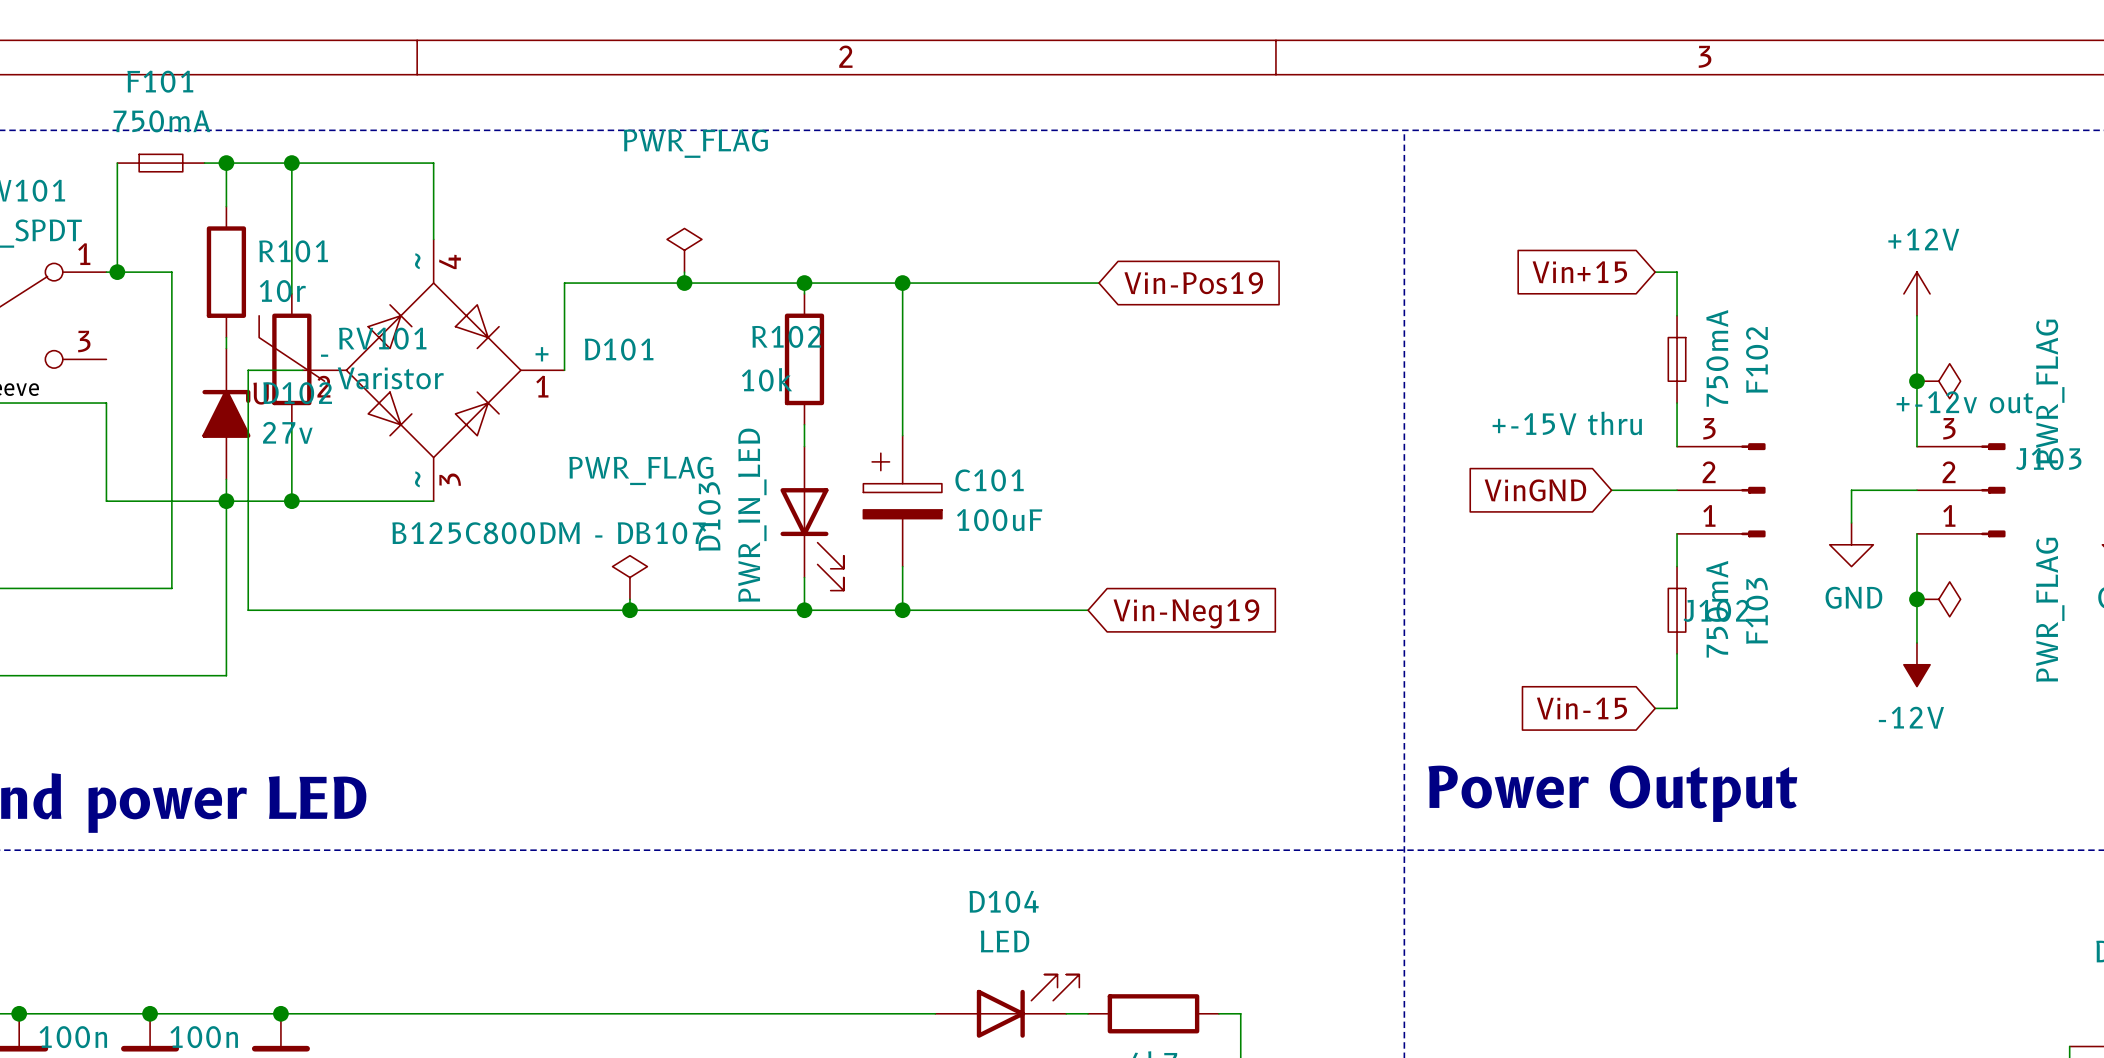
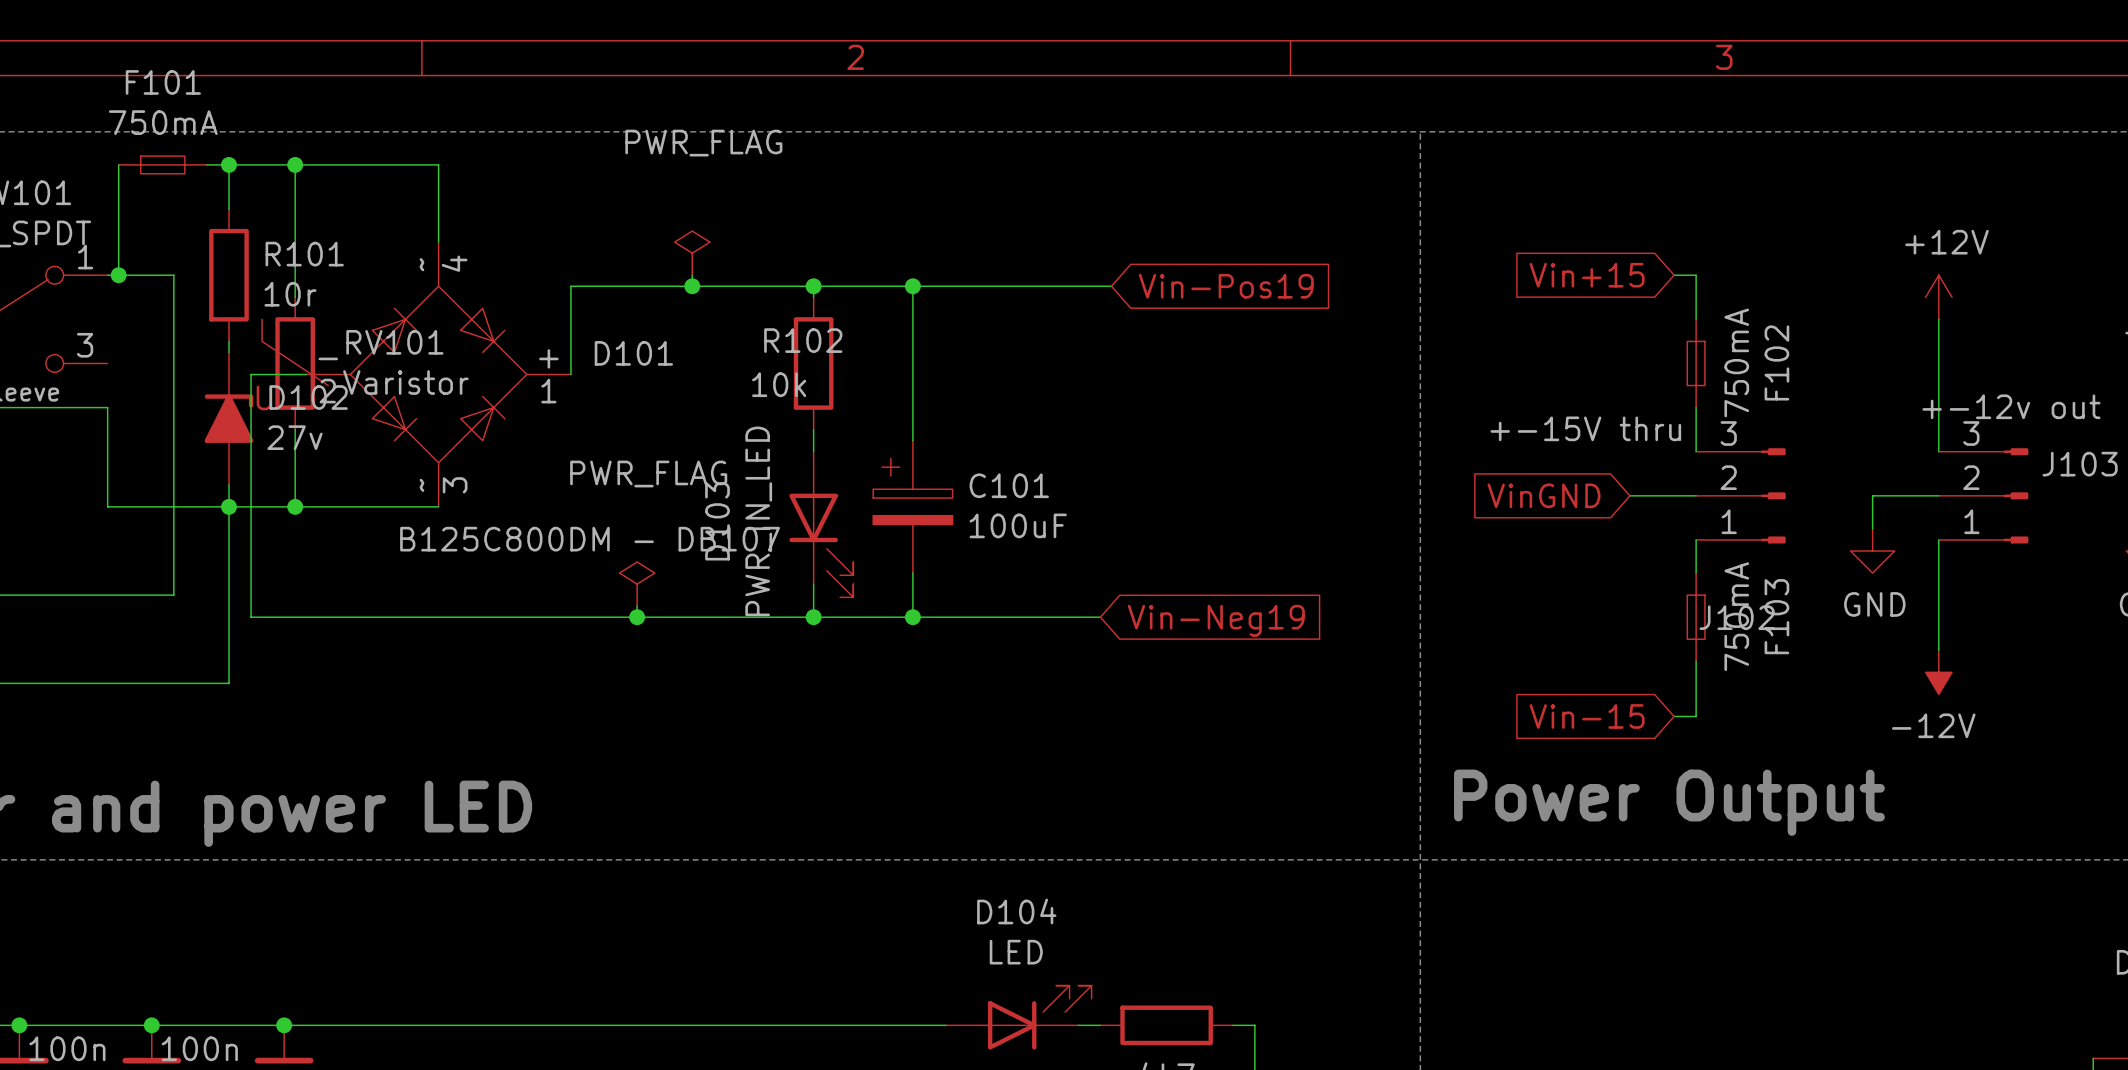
junction: (1916, 381) -> none
power symbol: PWR_FLAG (1938, 381) -> none
junction: (1916, 599) -> none
power symbol: PWR_FLAG (1938, 599) -> none

